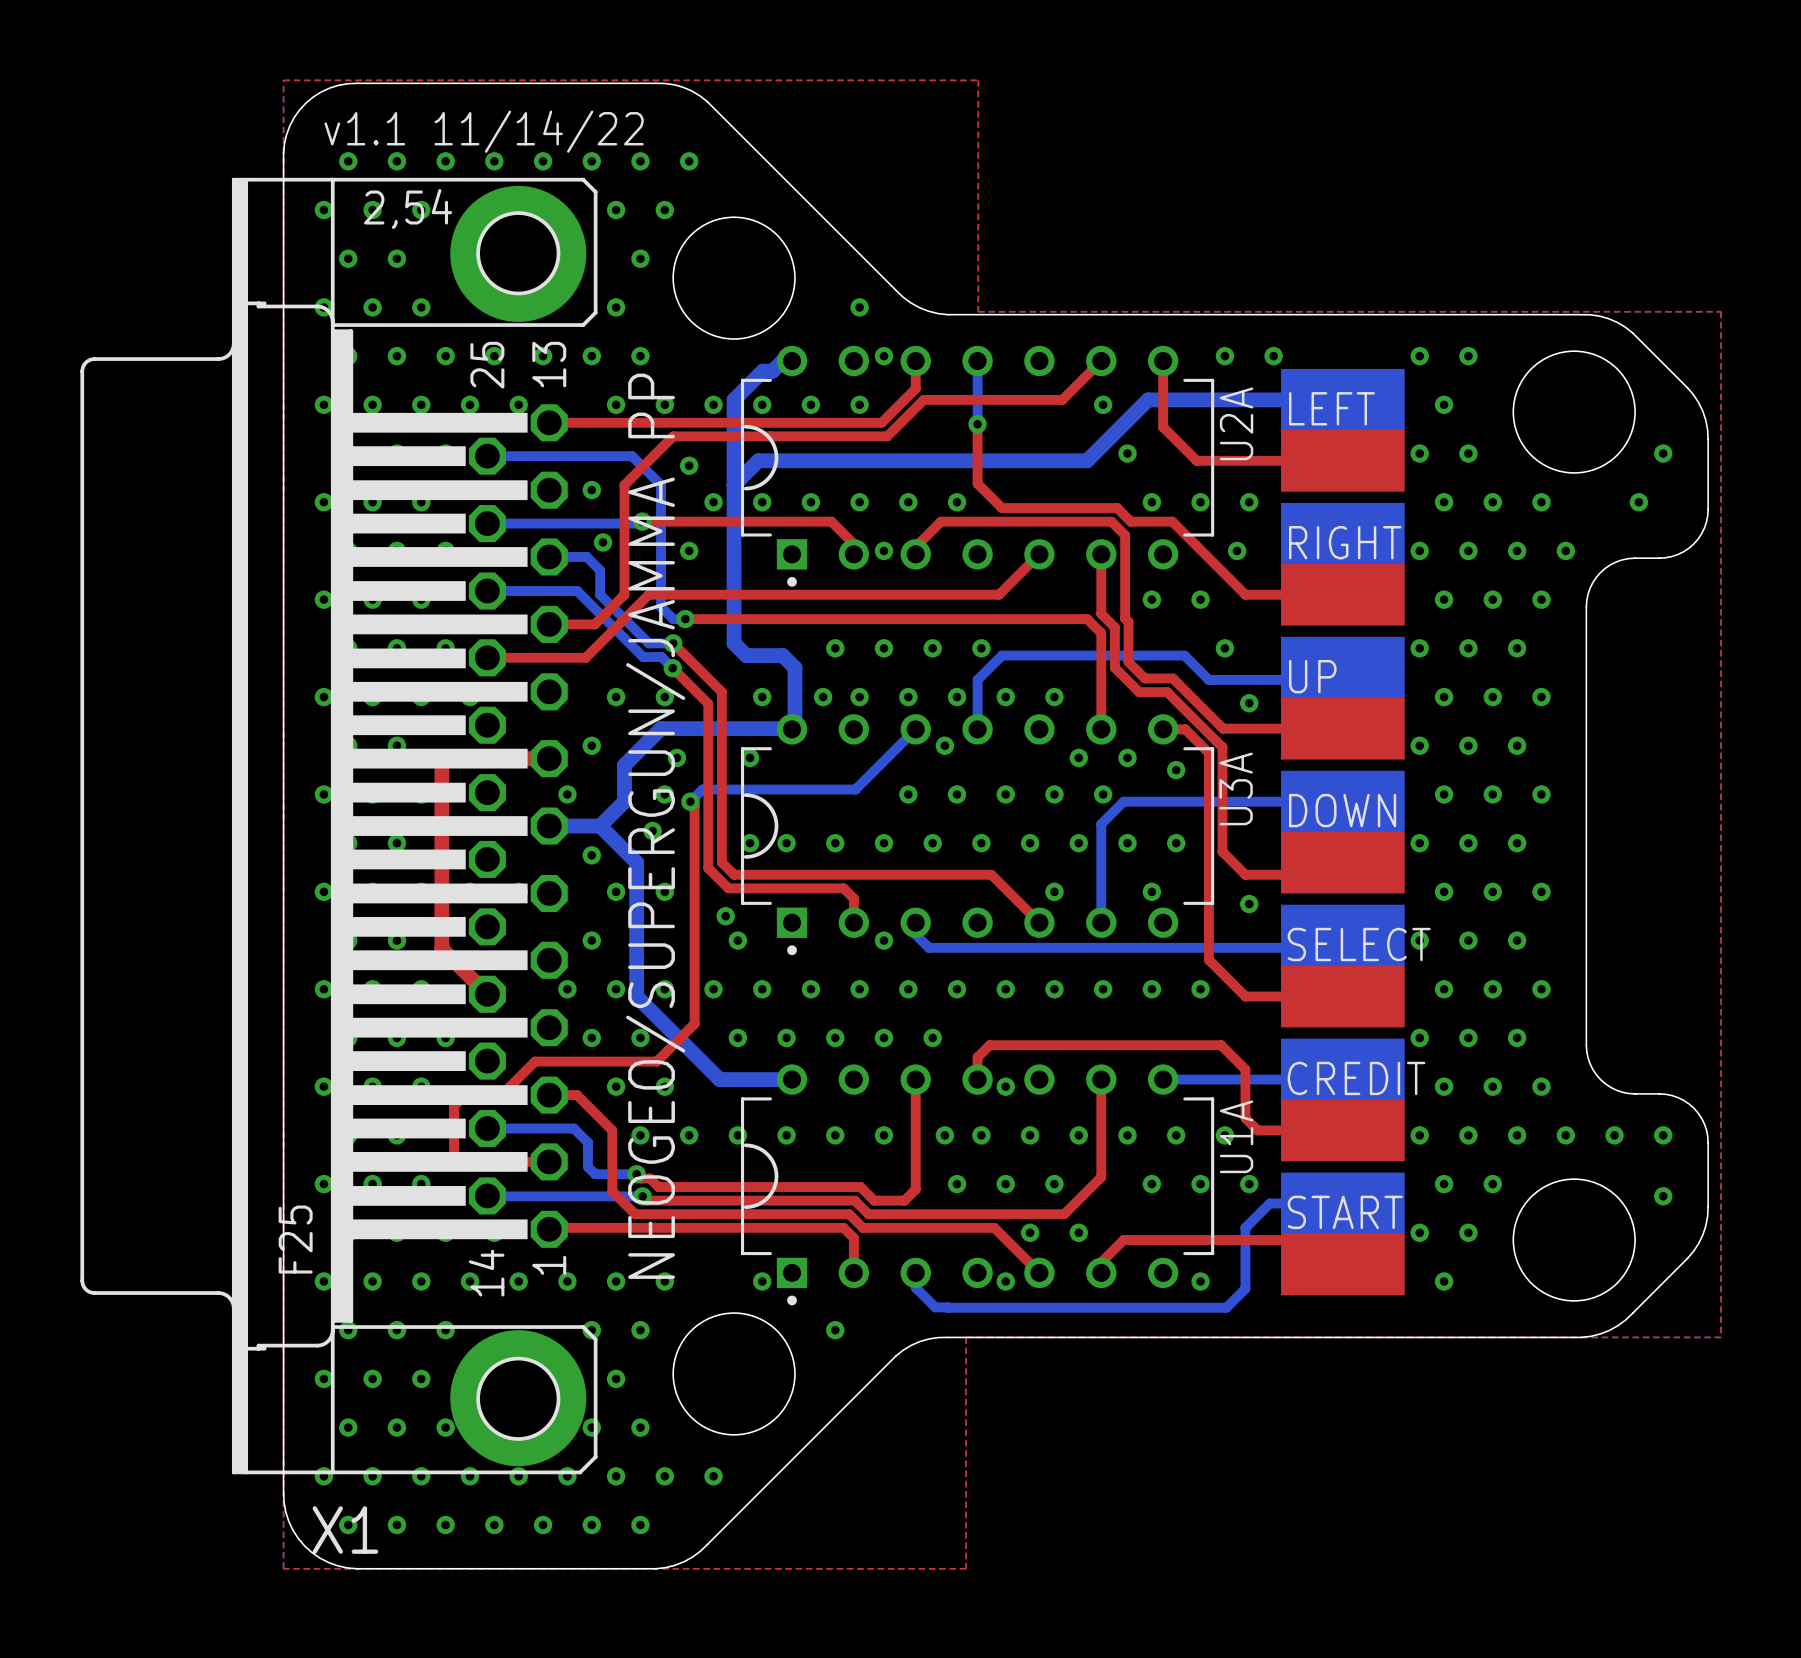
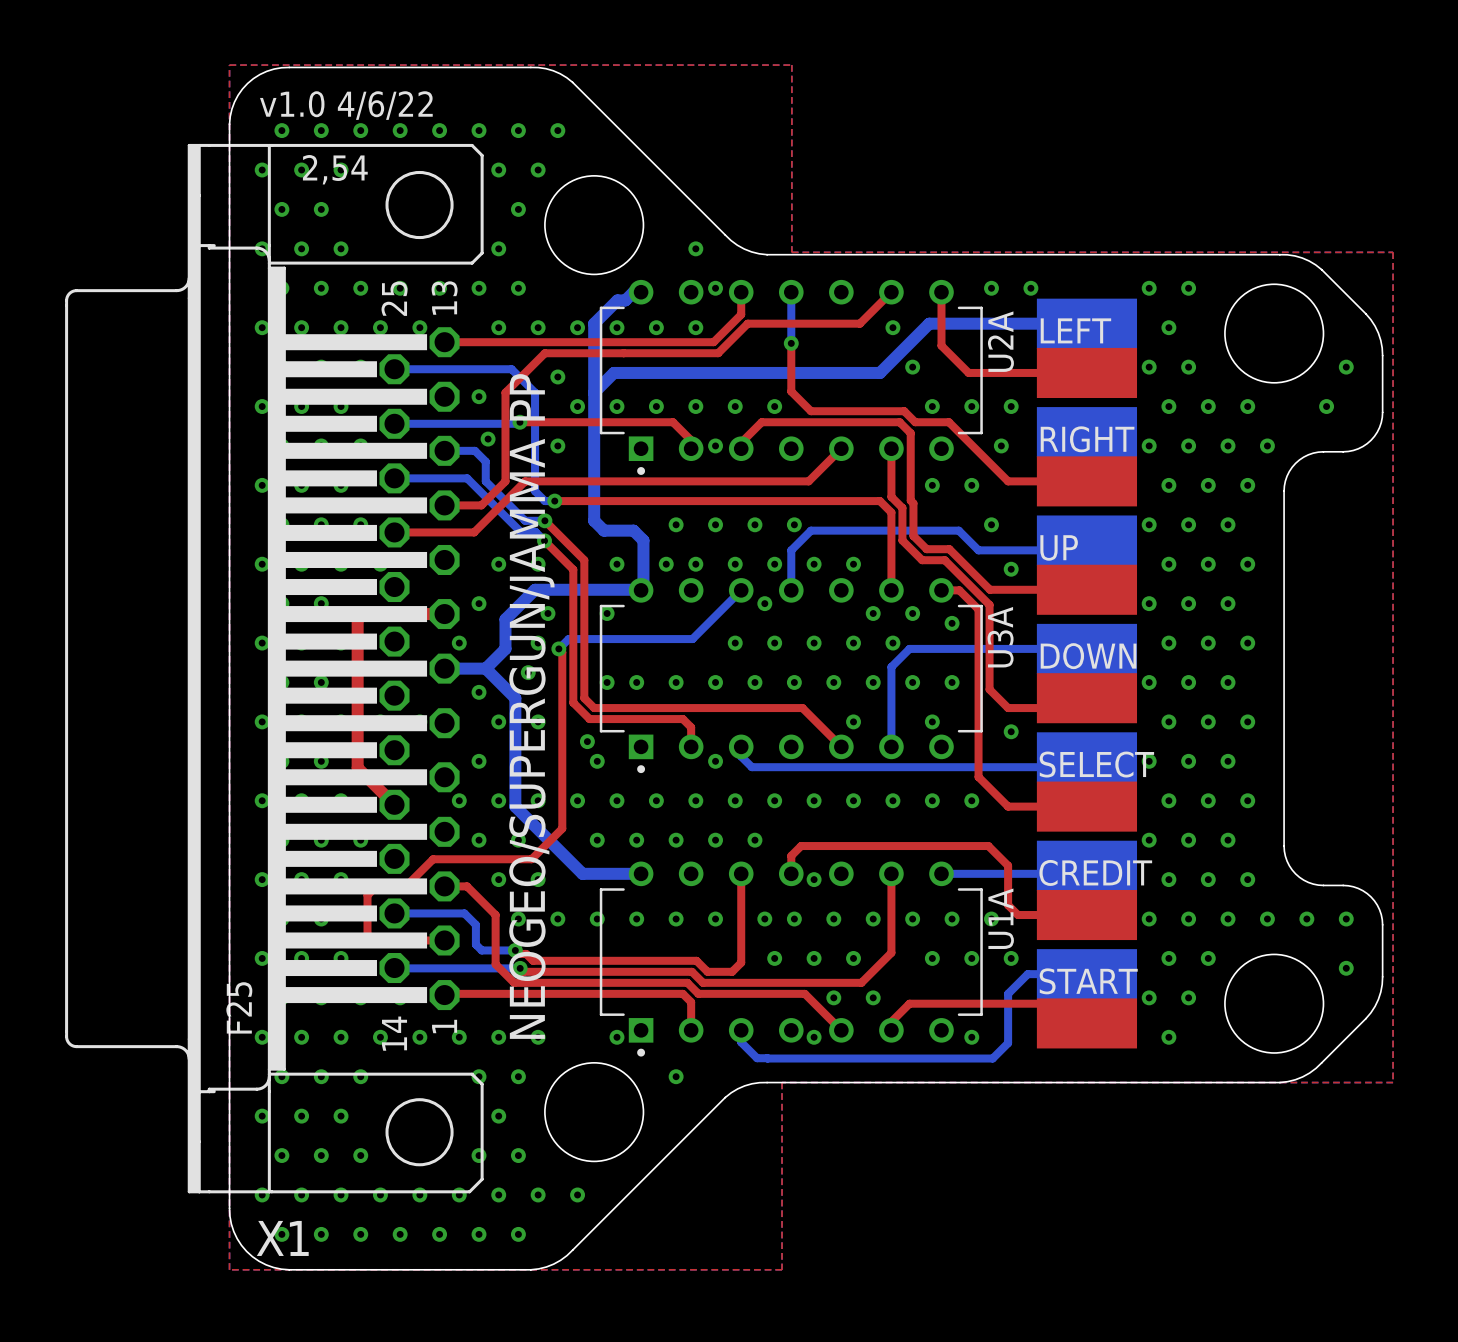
text: v1.1 11/14/22 (484, 131) -> v1.0 4/6/22 (346, 105)
X1 footprint: [80, 177, 598, 1475] -> [65, 143, 484, 1194]
U2A footprint: [740, 345, 1215, 587] -> [599, 279, 983, 475]
U3A footprint: [740, 714, 1215, 956] -> [599, 578, 983, 774]
U1A footprint: [740, 1064, 1215, 1306] -> [599, 861, 983, 1057]

